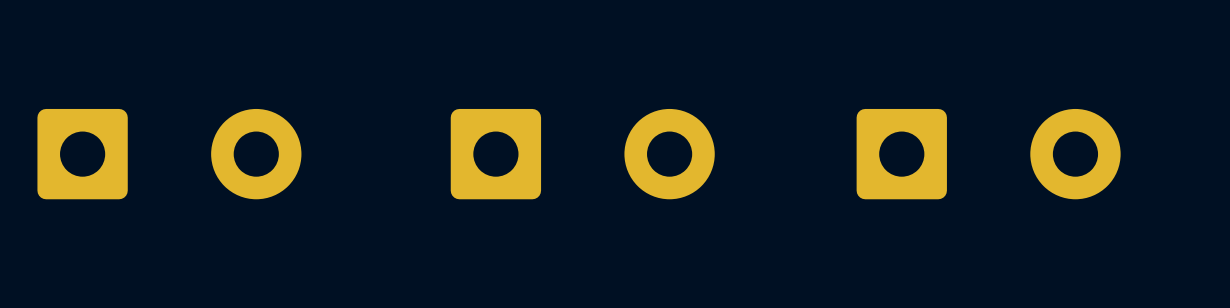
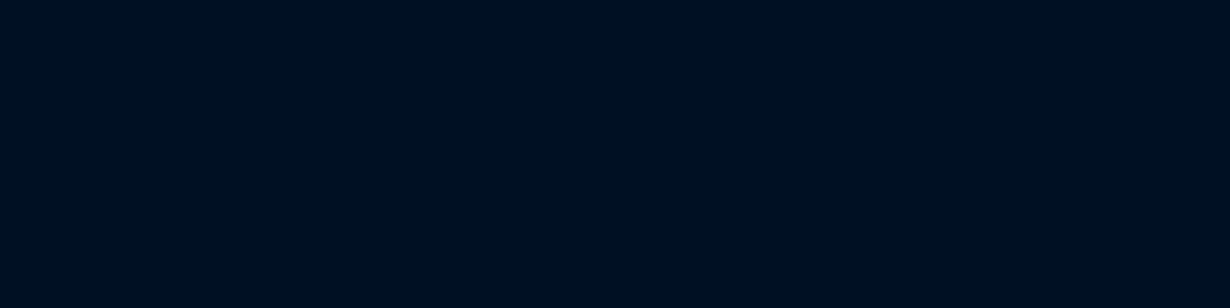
part: (169, 154) -> none
part: (582, 154) -> none
part: (988, 154) -> none

